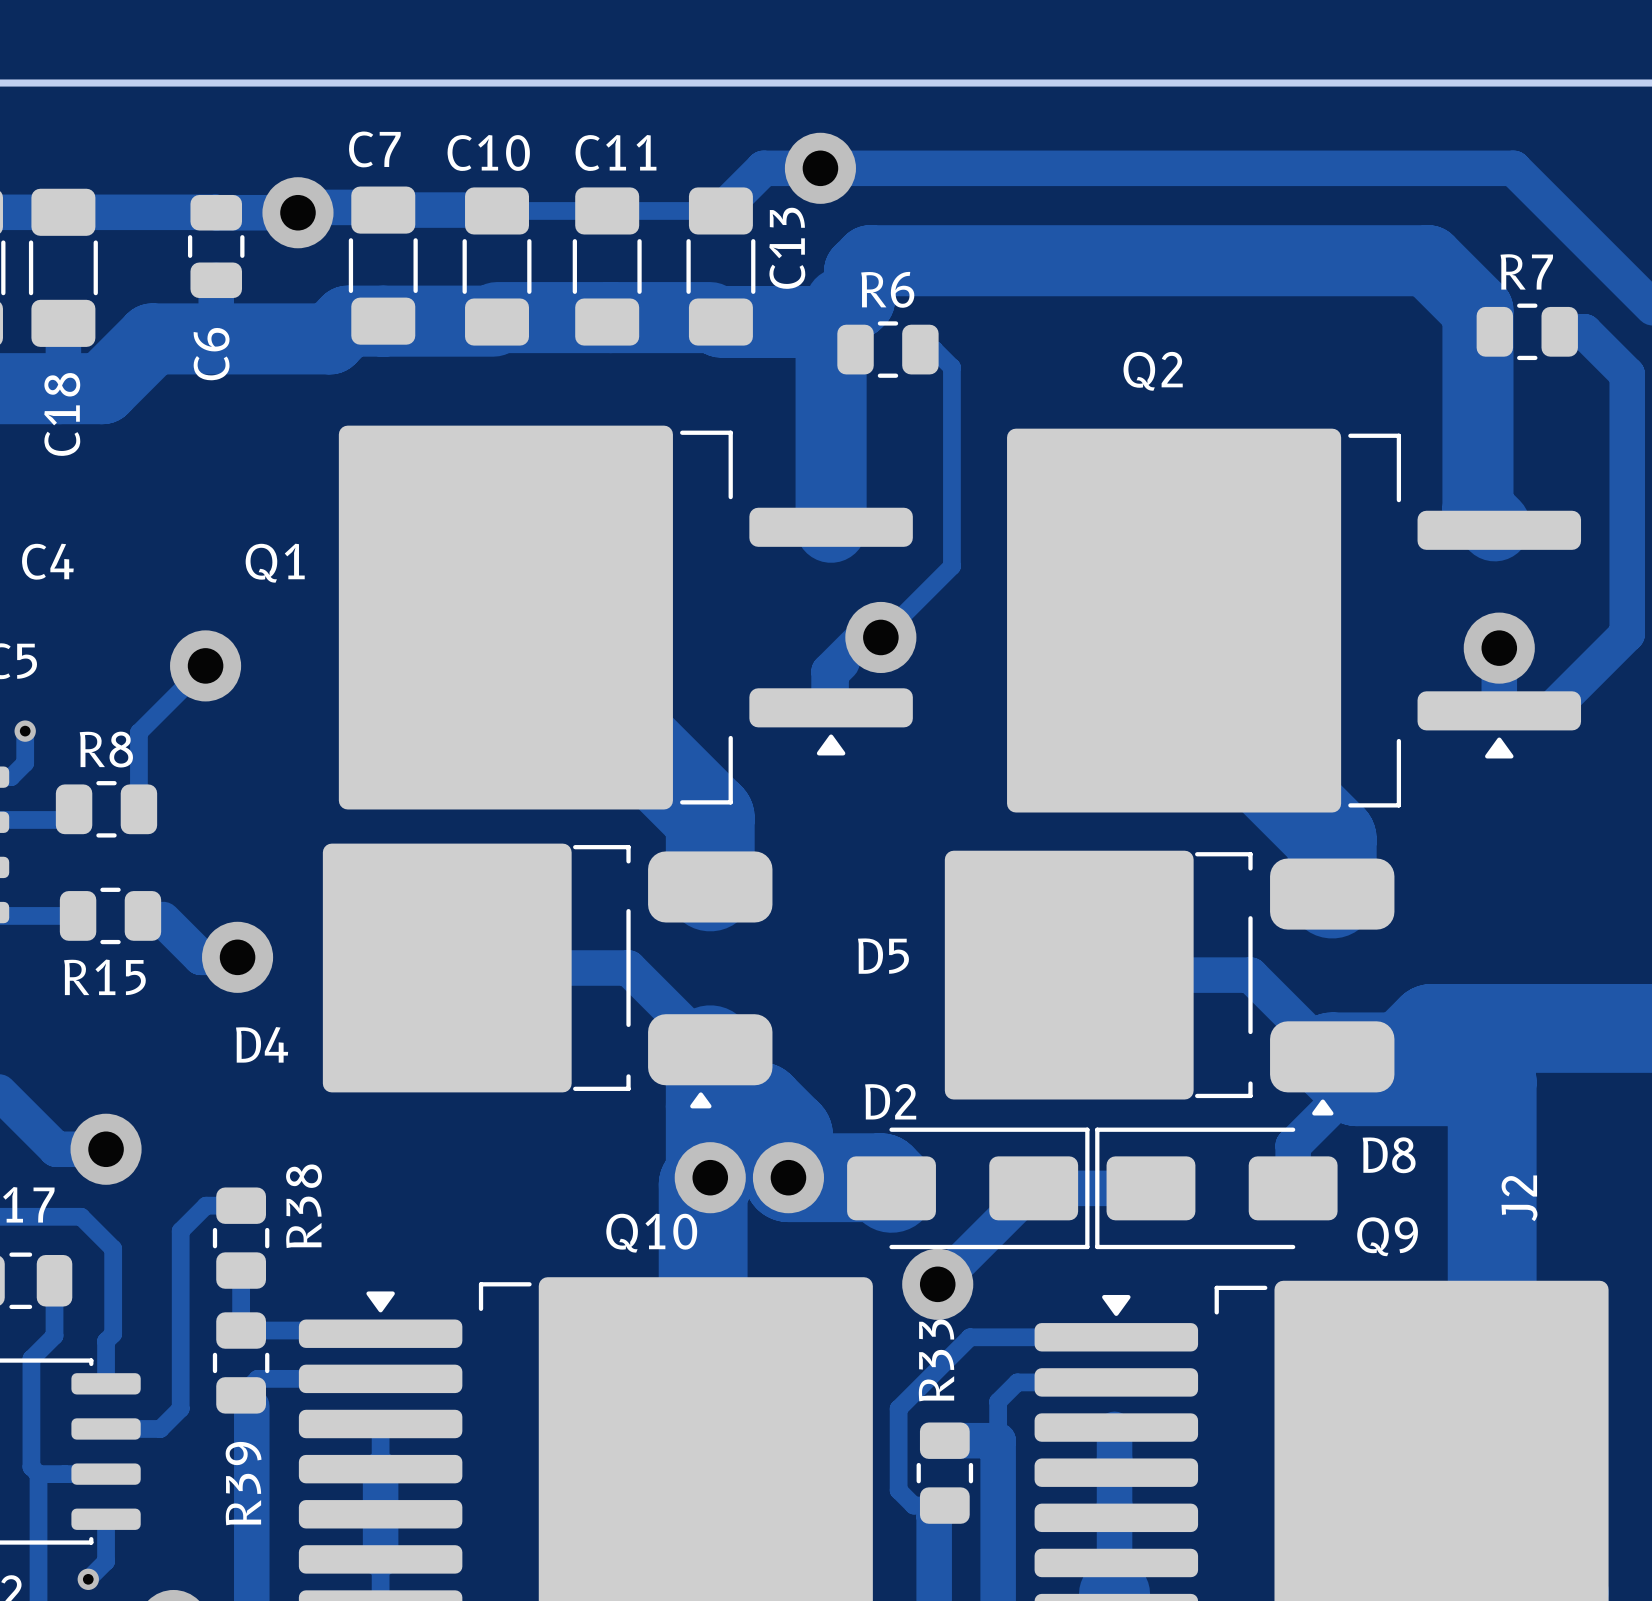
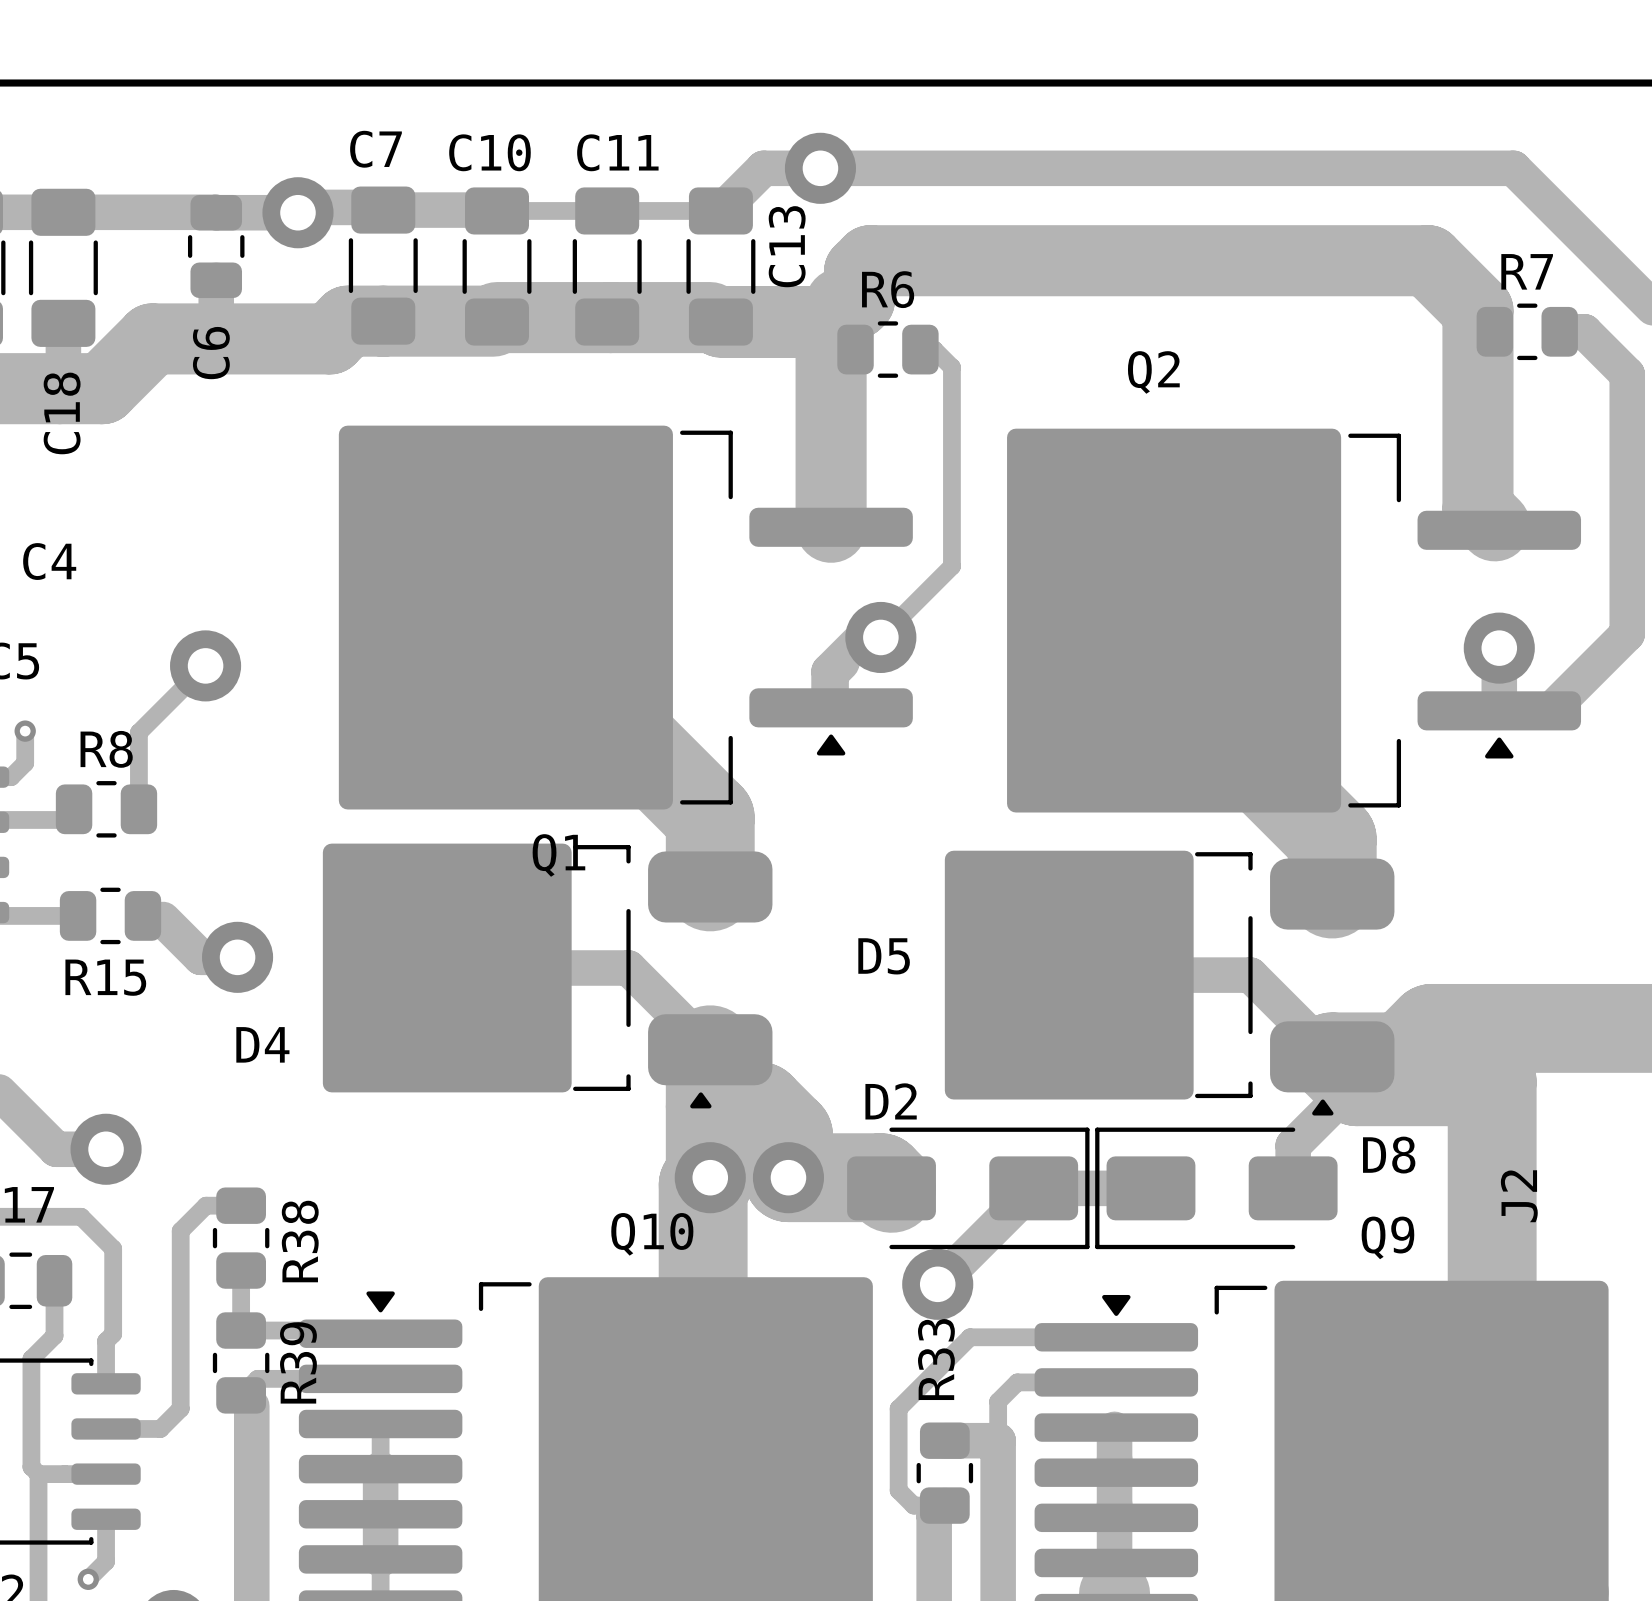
Q1 name position: Q1 (275, 563) -> Q1 (558, 855)
R38 name position: R38 (303, 1206) -> R38 (300, 1241)
R39 name position: R39 (243, 1483) -> R39 (298, 1362)

